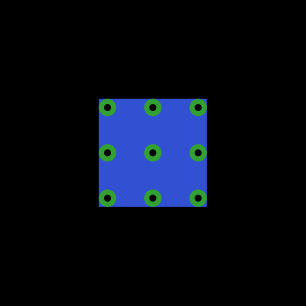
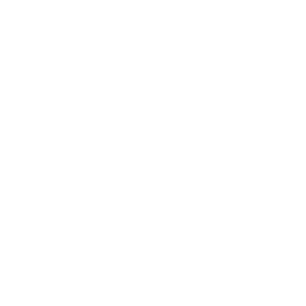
part: (152, 152) -> none

